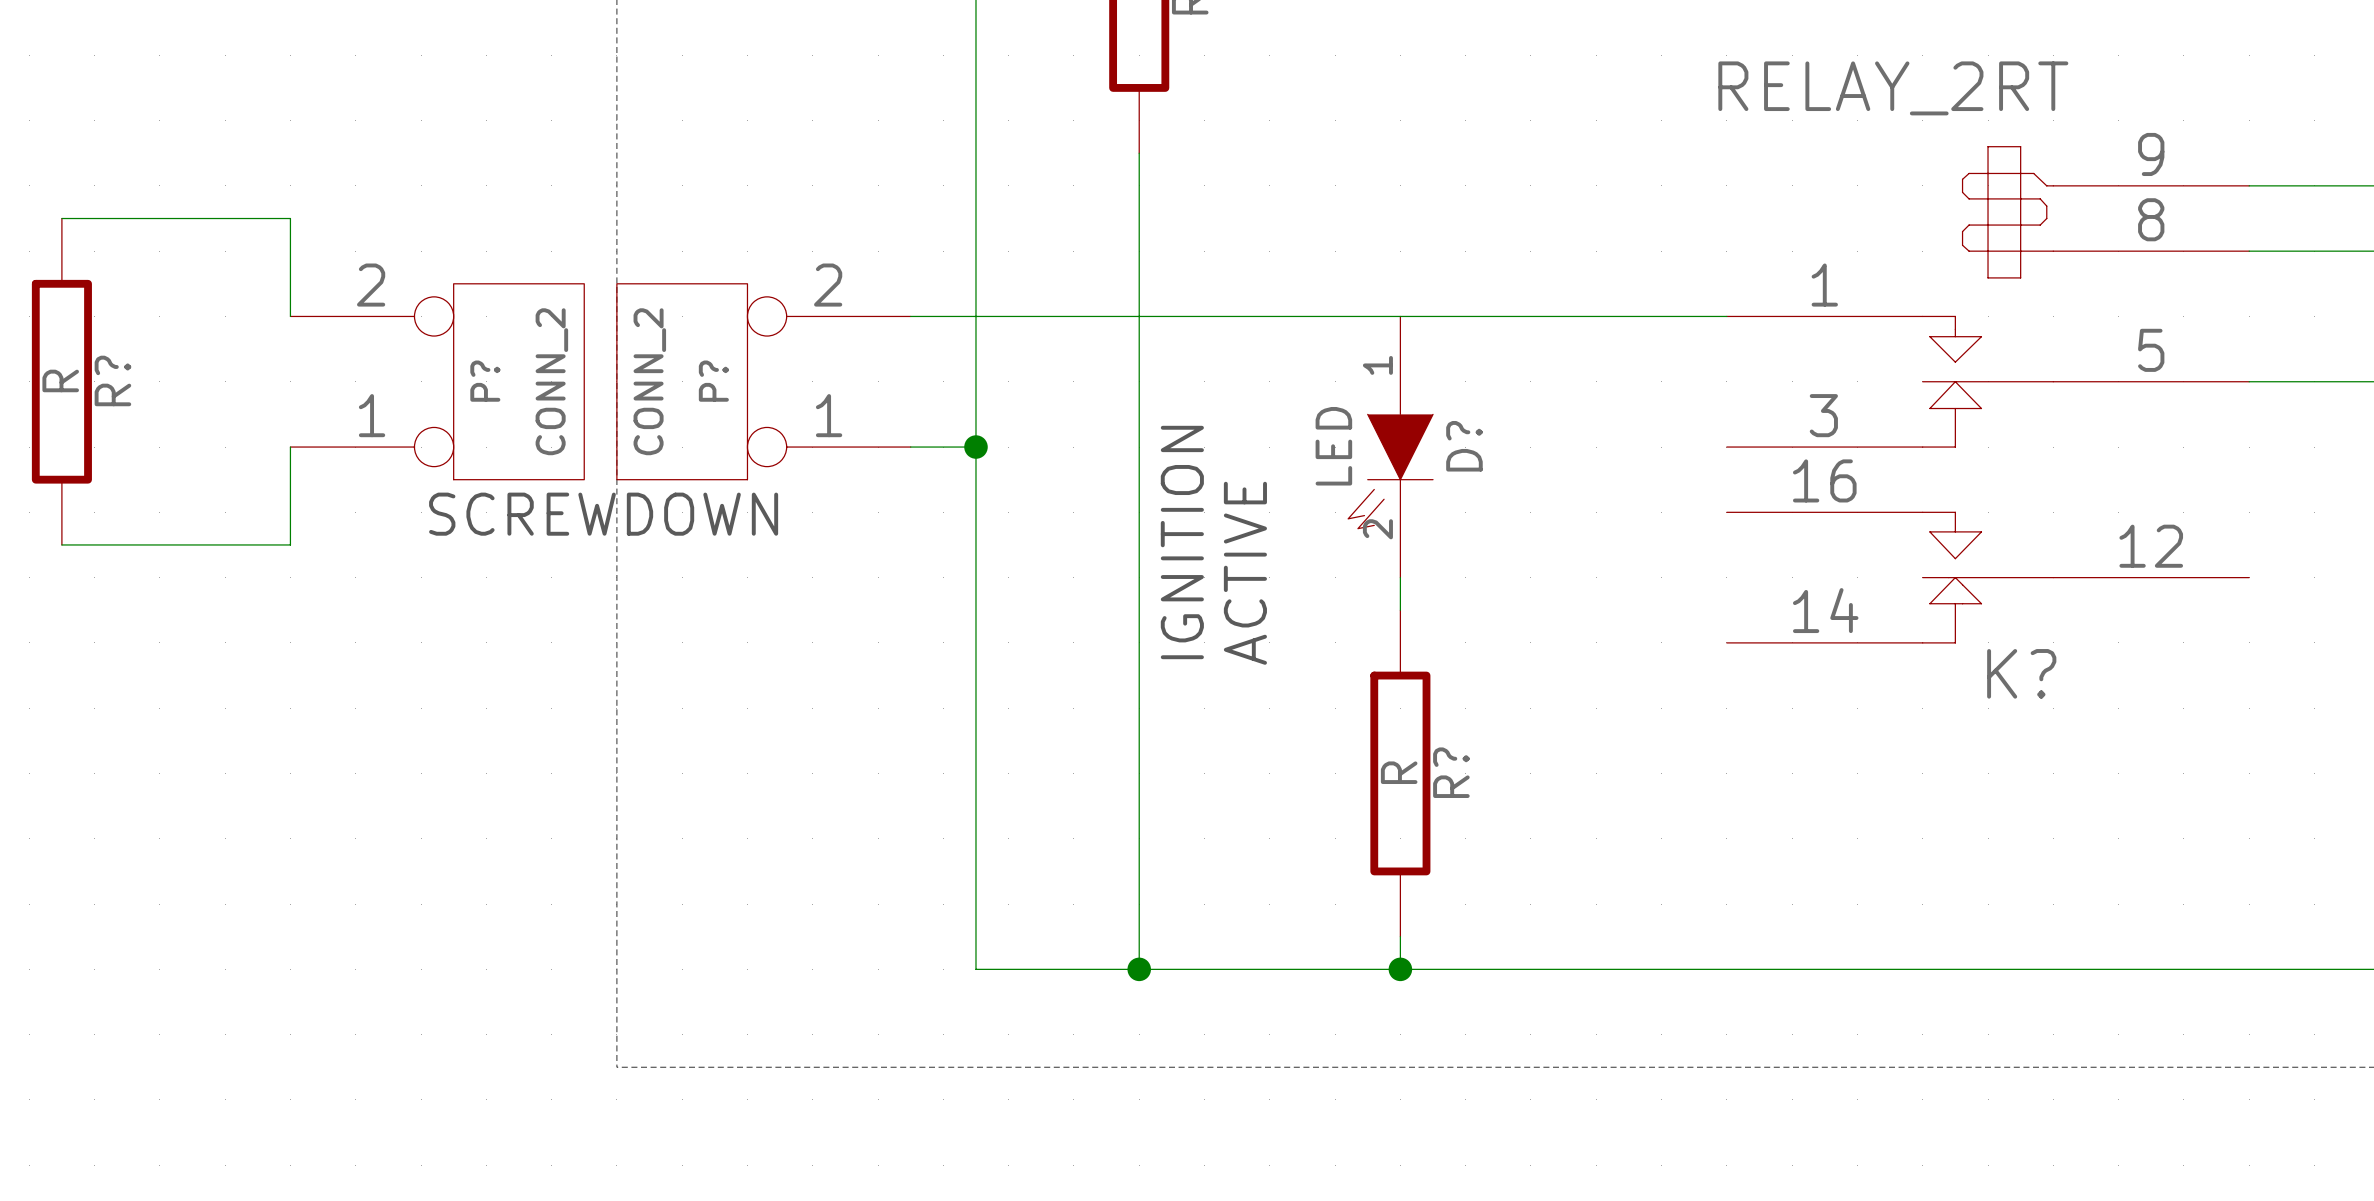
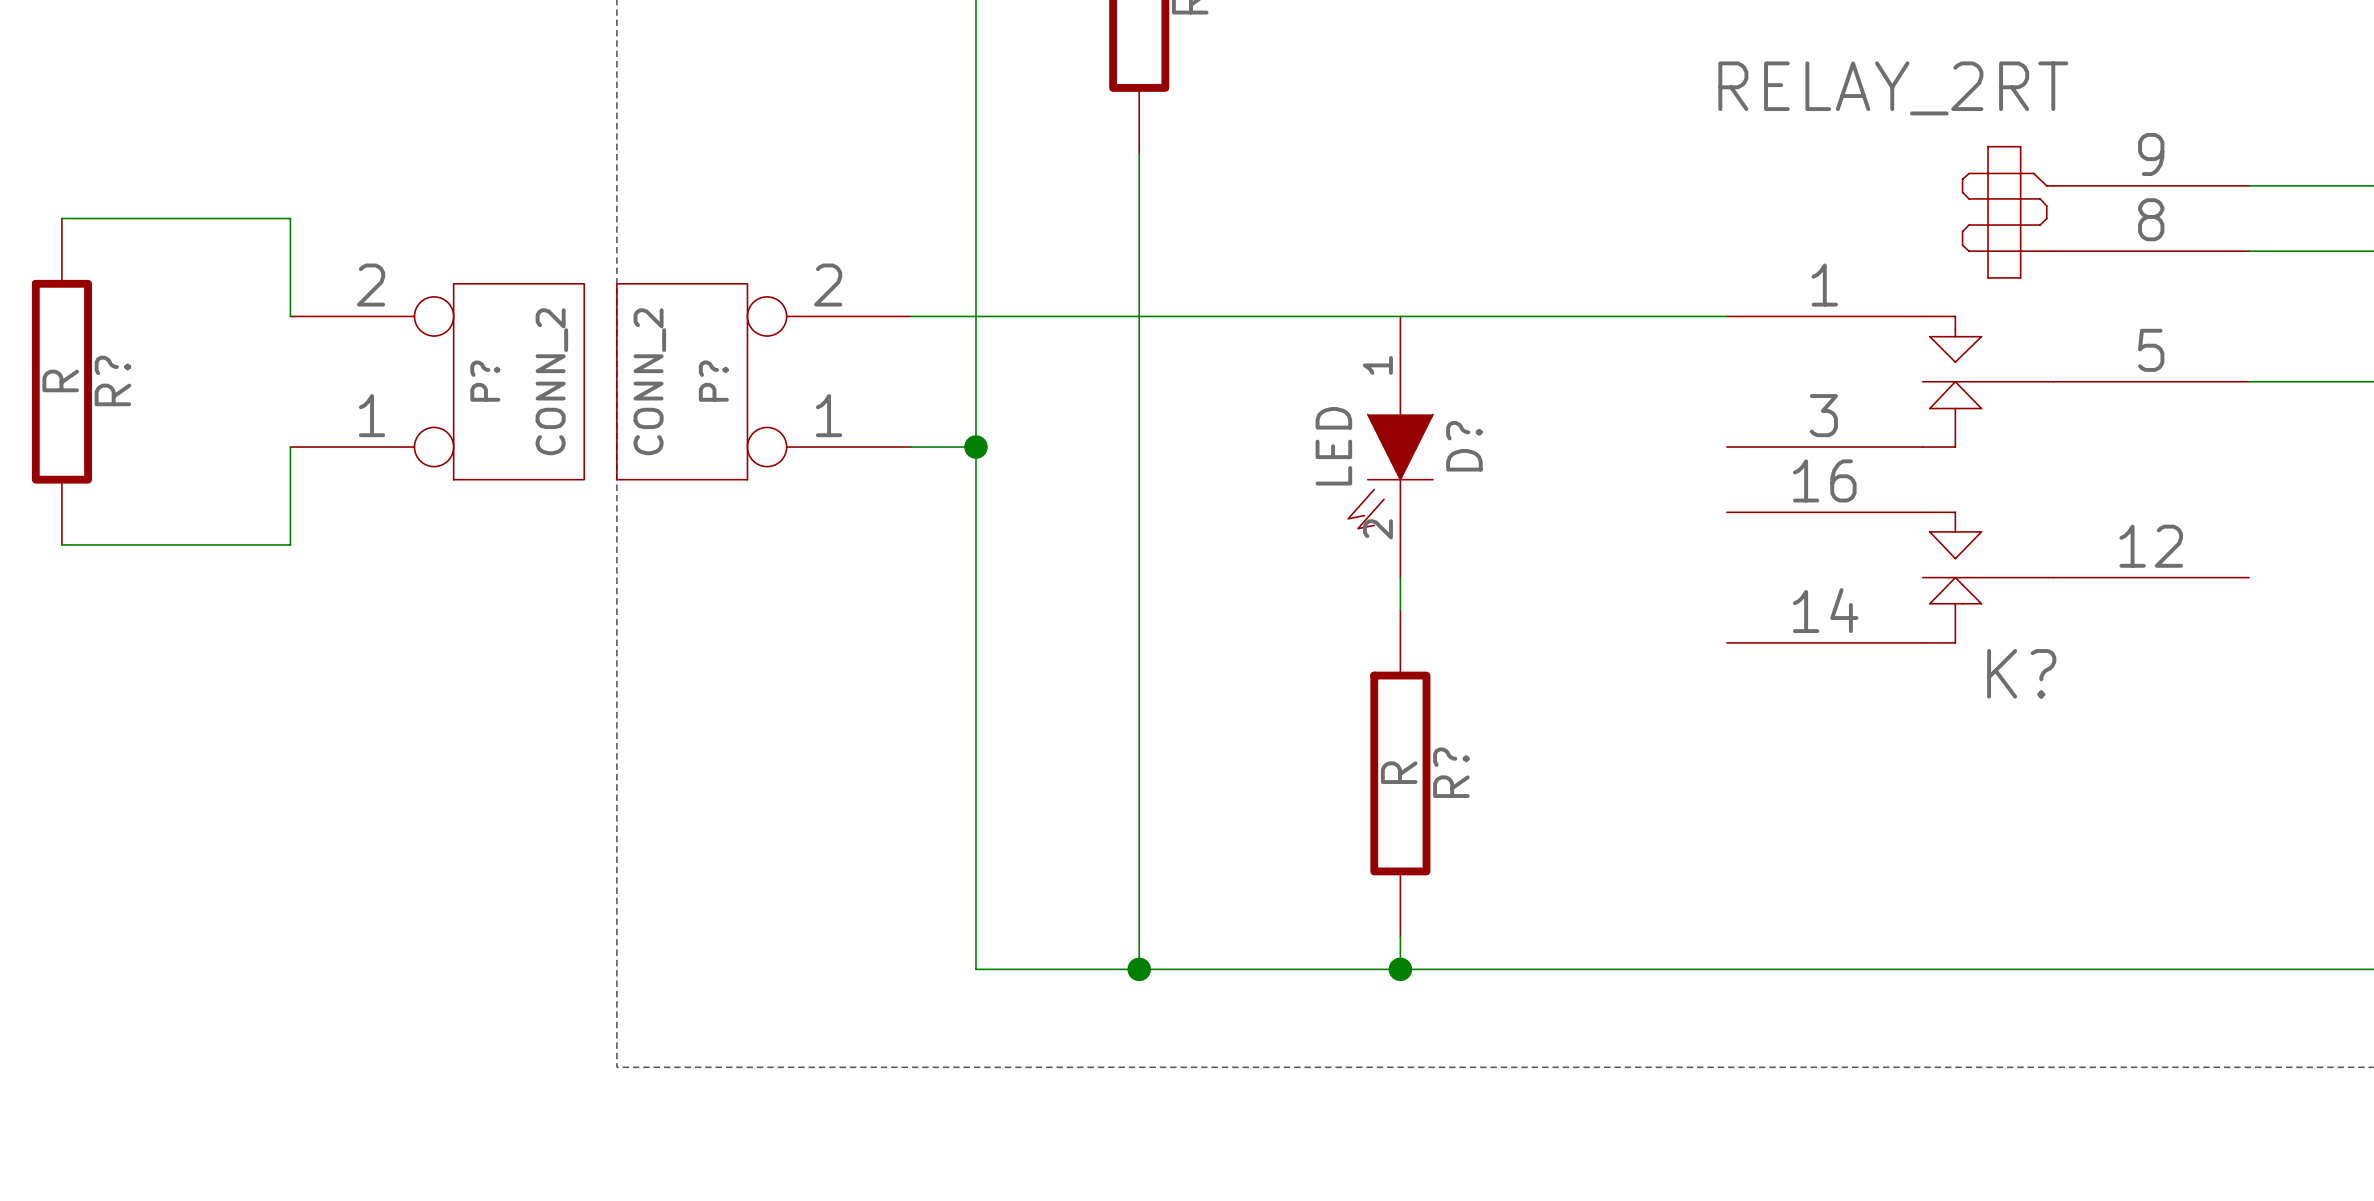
text: SCREWDOWN (603, 514) -> none
text: IGNITION (1182, 542) -> none
text: ACTIVE (1245, 573) -> none

